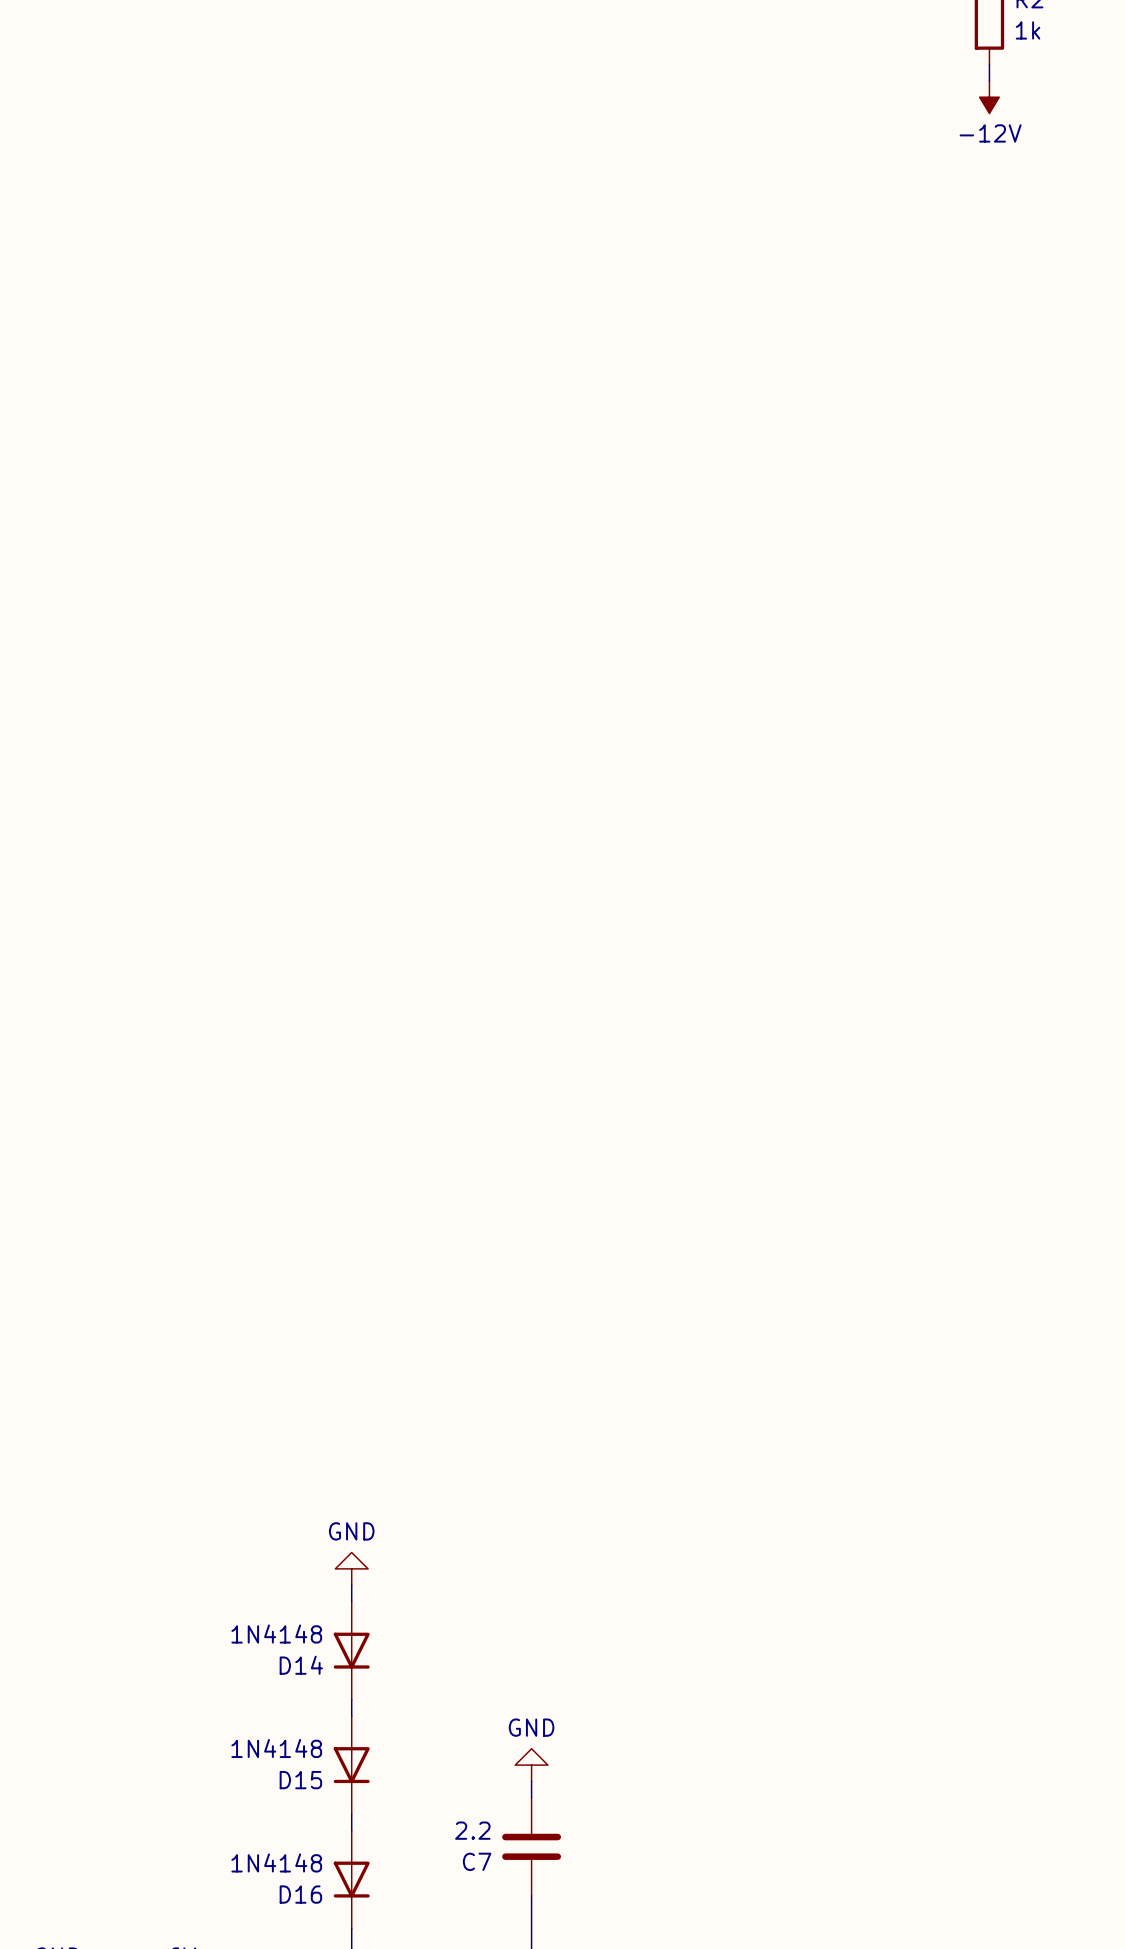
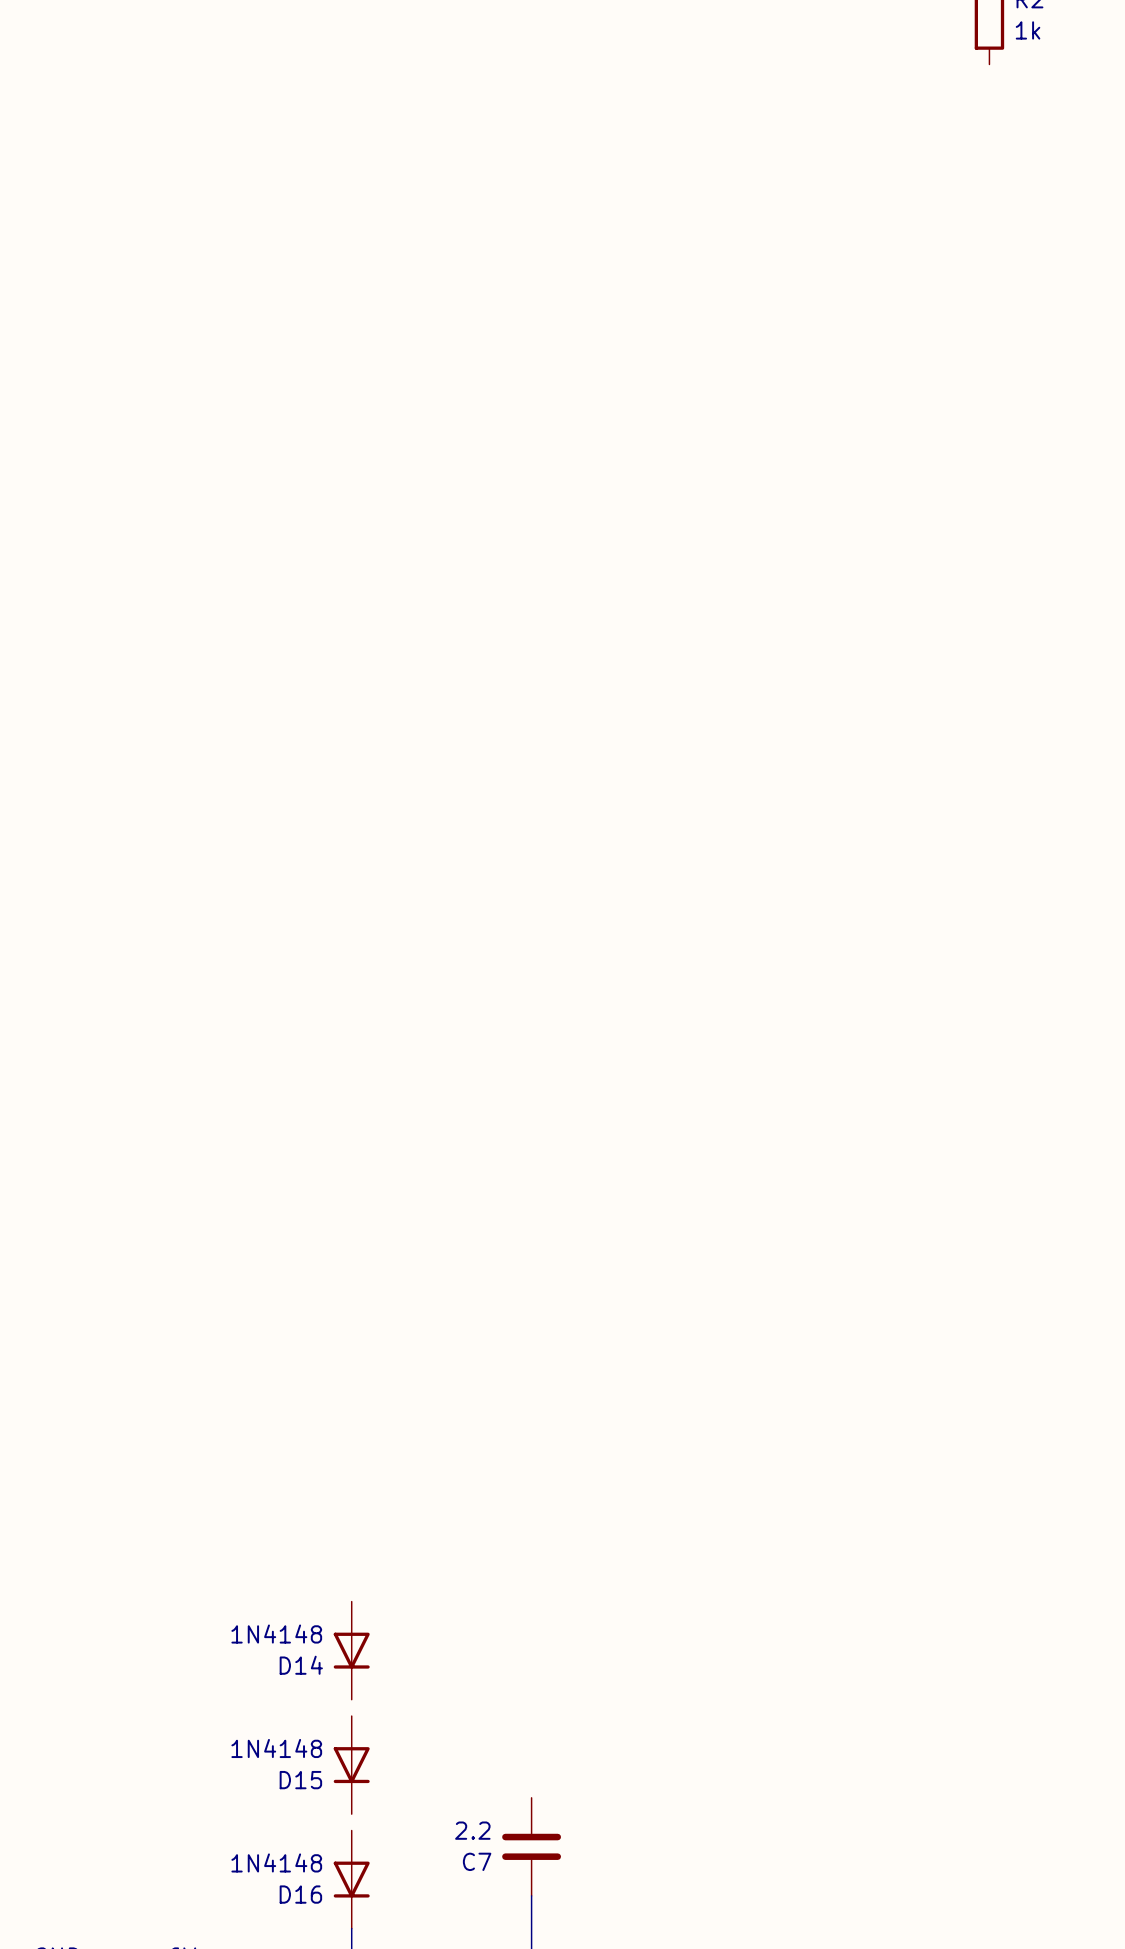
wire: (989, 64) (989, 80) -> none
power symbol: -12V (989, 97) -> none
power symbol: GND (351, 1568) -> none
wire: (351, 1585) (351, 1601) -> none
wire: (351, 1699) (351, 1716) -> none
power symbol: GND (531, 1765) -> none
wire: (531, 1781) (531, 1797) -> none
wire: (351, 1814) (351, 1830) -> none

